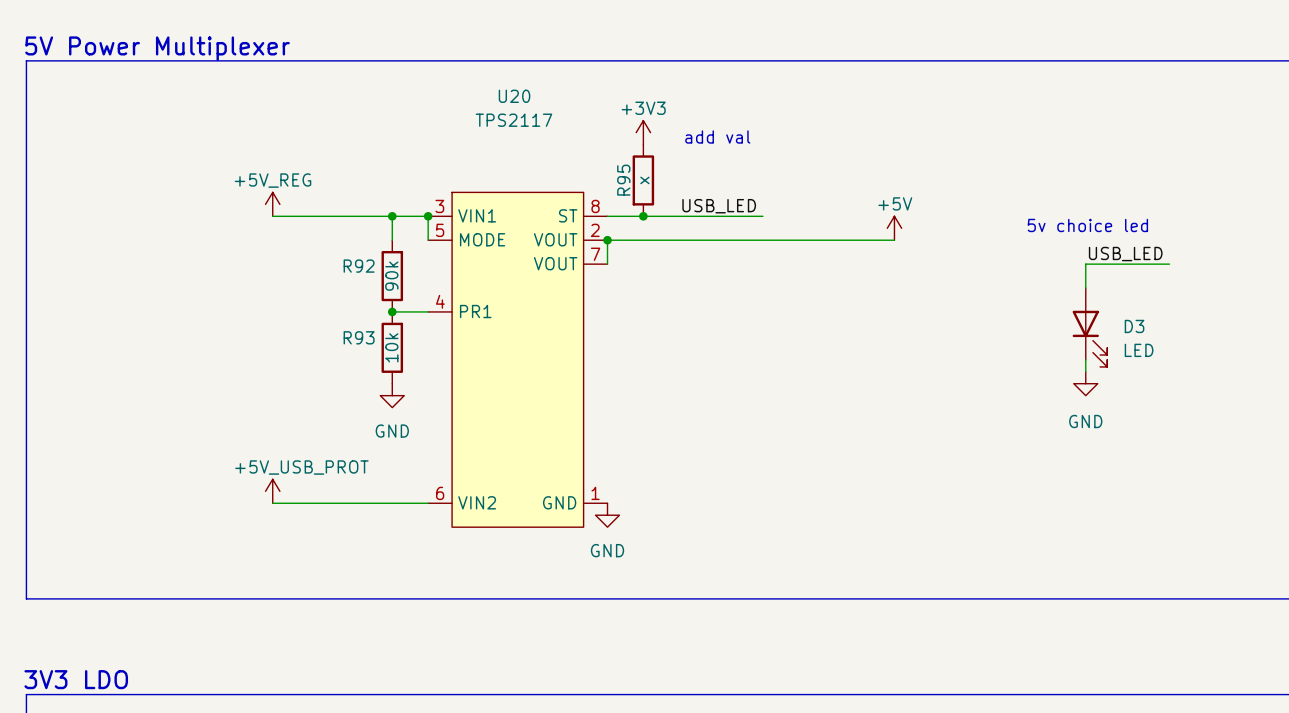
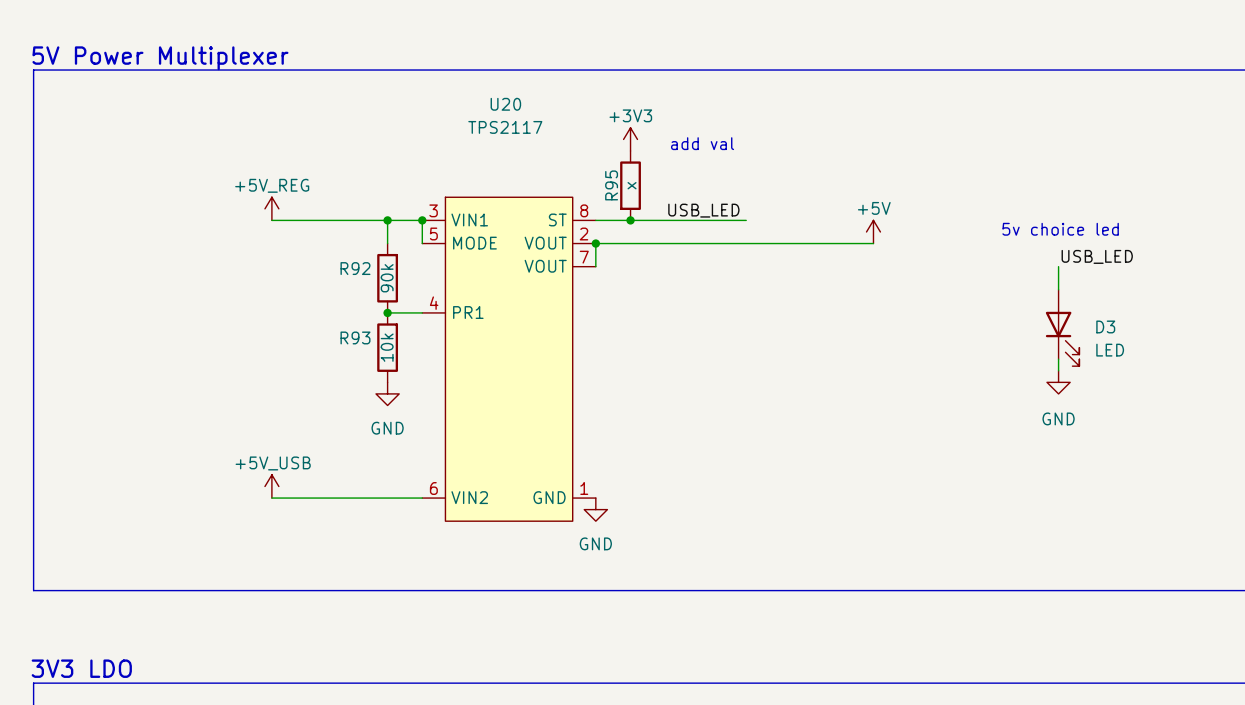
wire: (1085, 264) (1169, 264) -> none
power symbol: +5V_USB_PROT (272, 491) -> +5V_USB (271, 486)

